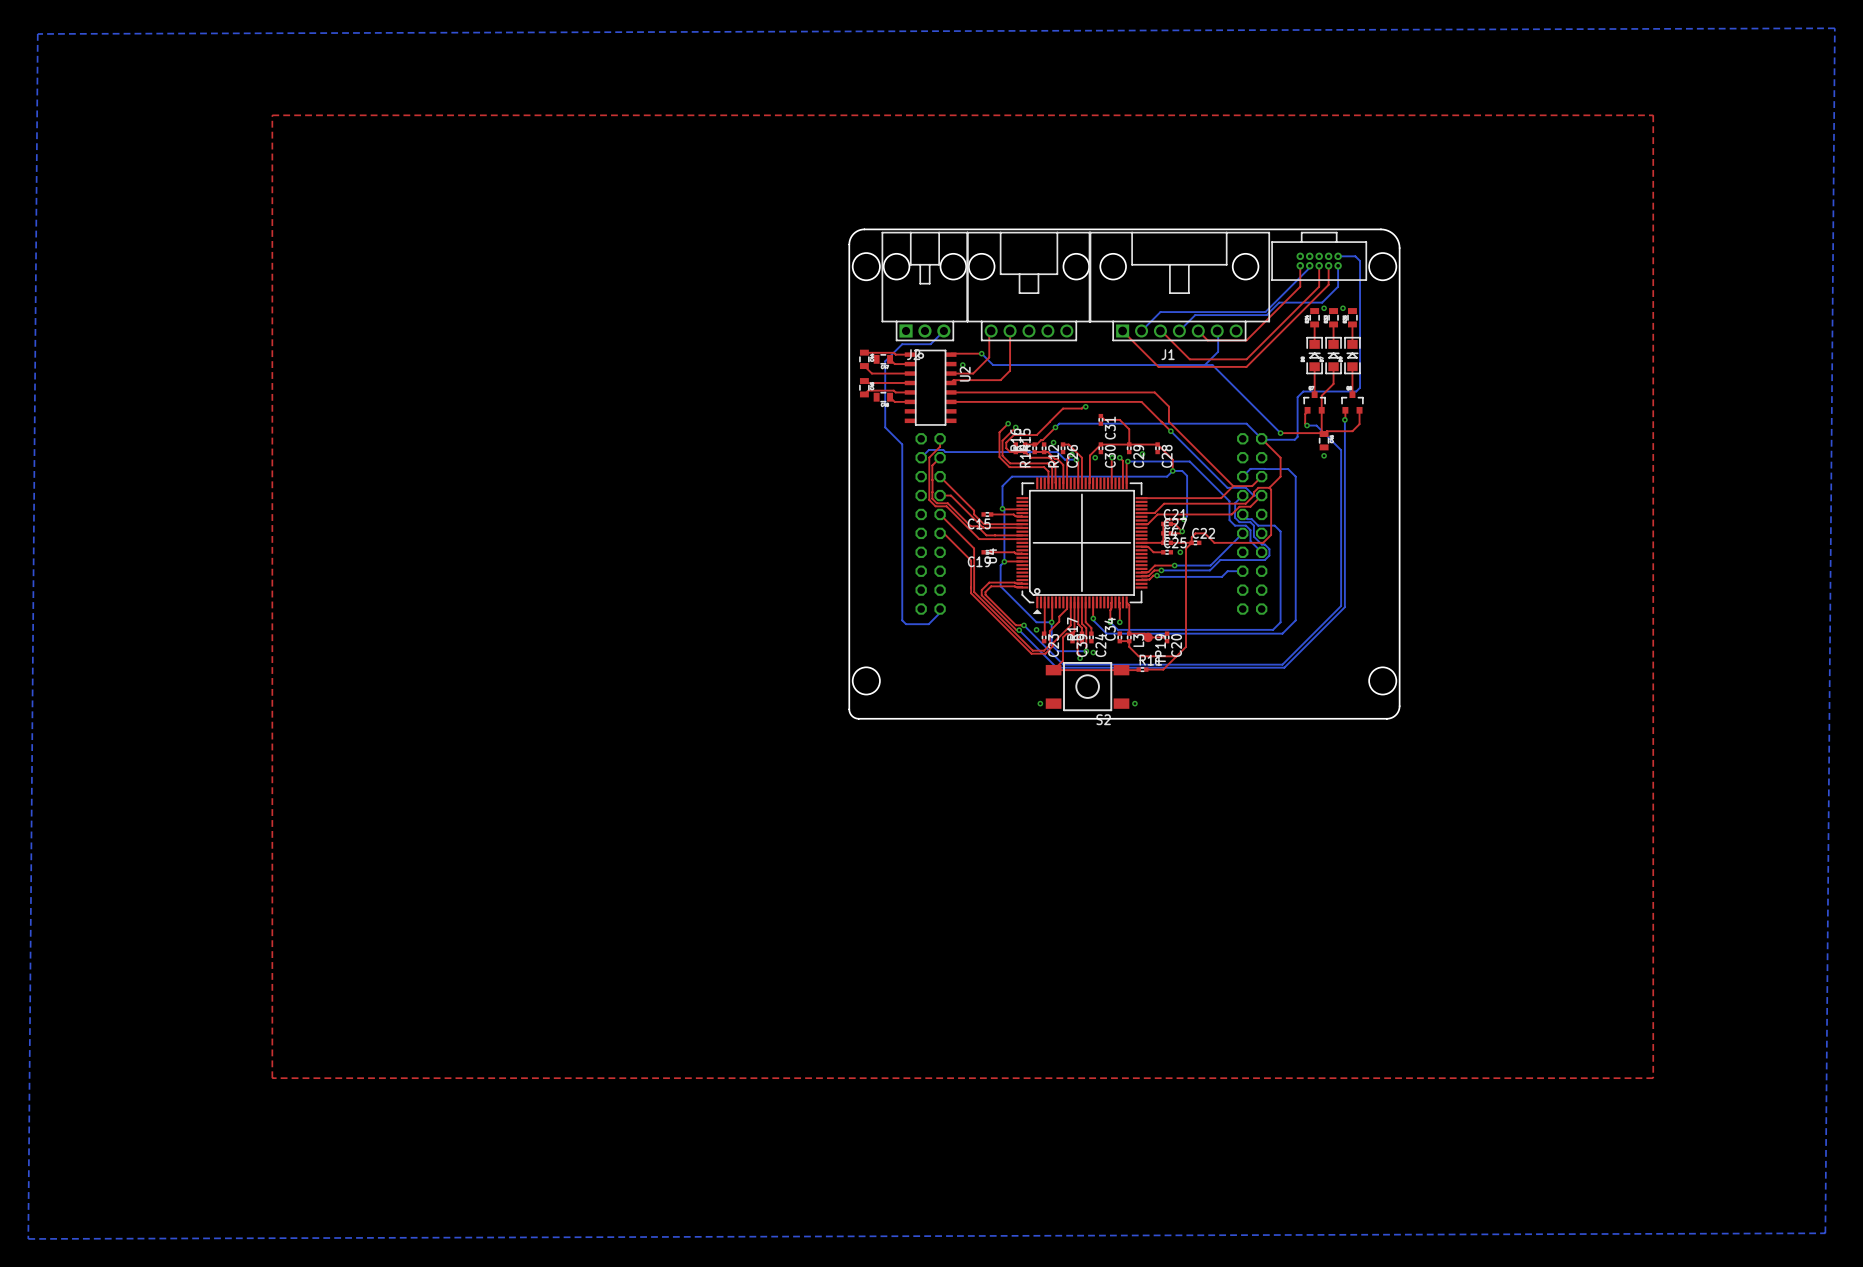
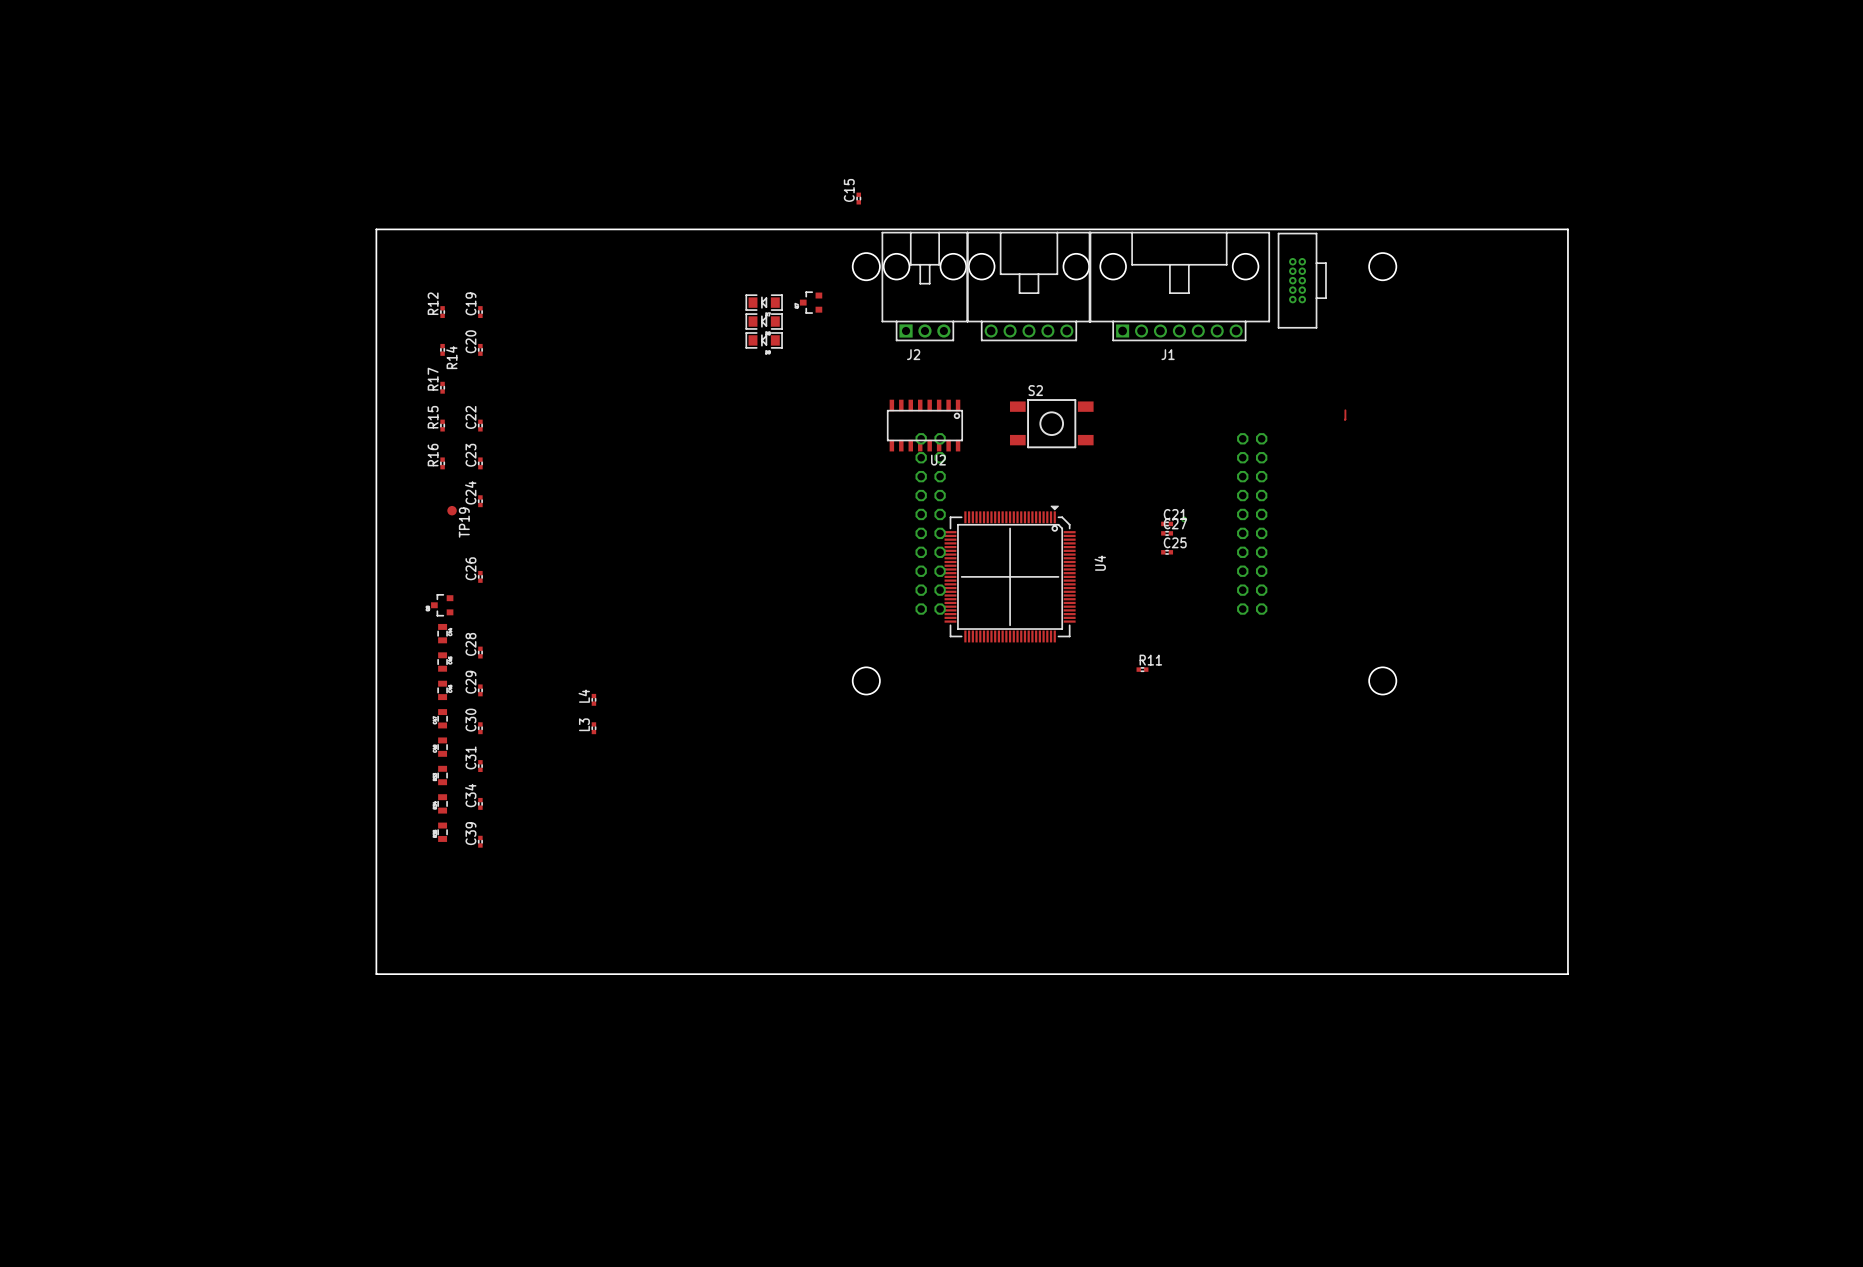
bottom zone outline: (1834, 28) (1825, 1233) (28, 1238) (37, 33) (1834, 28) -> none
top zone outline: (272, 115) (1653, 115) (1653, 1078) (272, 1078) (272, 115) -> none
board edge: (864, 229) (853, 233) (849, 244) (849, 709) (852, 715) (858, 718) (1386, 718) (1395, 715) (1399, 706) (1399, 248) (1394, 234) (1380, 229) -> (864, 229) (376, 229) (376, 974) (1567, 974) (1567, 229) (1380, 229)
part rotation: 0° (1319, 256) -> 90° clockwise (1302, 280)
bottom track: (1338, 256) (1355, 256) (1360, 260) (1360, 387) (1356, 391) (1303, 391) (1297, 397) (1297, 436) (1294, 439) (1262, 439) -> none
top track: (1300, 265) (1300, 286) (1246, 340) (1207, 340) (1198, 330) -> none
bottom track: (1309, 265) (1265, 312) (1160, 312) (1141, 330) -> none
top track: (1319, 265) (1319, 286) (1246, 359) (1189, 359) (1160, 330) -> none
top track: (1328, 265) (1328, 284) (1246, 366) (1158, 366) (1122, 330) -> none
bottom track: (1338, 265) (1338, 286) (1322, 302) (1279, 302) (1266, 315) (1195, 315) (1179, 330) -> none
via: (1324, 308) -> none
via: (1343, 308) -> none
part position: (1314, 317) -> (442, 803)
part position: (1333, 317) -> (442, 775)
part position: (1352, 317) -> (442, 832)
top track: (1314, 324) (1314, 344) -> none
top track: (1333, 324) (1333, 344) -> none
top track: (1352, 324) (1352, 344) -> none
bottom track: (943, 330) (930, 344) (902, 344) (885, 361) (885, 427) (902, 444) (902, 620) (906, 624) (928, 624) (940, 612) (940, 609) -> none
top track: (991, 330) (989, 332) (989, 357) (973, 373) (950, 373) -> none
top track: (1010, 330) (1010, 370) (1000, 380) (953, 380) (950, 383) -> none
bottom track: (1217, 330) (1218, 351) (1204, 365) -> none
top track: (864, 352) (910, 354) -> none
top track: (981, 353) (950, 354) -> none
bottom track: (981, 353) (993, 365) (1212, 365) (1280, 433) -> none
via: (981, 353) -> none
part rotation: 0° (1314, 355) -> 90° counterclockwise (764, 321)
part position: (1314, 355) -> (764, 321)
part rotation: 0° (1333, 355) -> 90° counterclockwise (764, 302)
part position: (1333, 355) -> (764, 302)
part rotation: 0° (1352, 355) -> 90° counterclockwise (764, 340)
part position: (1352, 355) -> (764, 340)
part position: (864, 359) -> (442, 633)
part rotation: 0° (883, 359) -> 90° clockwise (442, 718)
part position: (883, 359) -> (442, 718)
top track: (890, 359) (894, 364) (910, 364) -> none
via: (962, 365) -> none
top track: (864, 366) (871, 373) (910, 373) -> none
top track: (1314, 366) (1314, 394) -> none
top track: (1333, 366) (1333, 383) (1321, 395) (1321, 431) (1324, 433) (1326, 431) (1352, 431) (1359, 424) (1359, 410) -> none
top track: (1352, 366) (1352, 394) -> none
top track: (864, 381) (866, 383) (910, 383) -> none
part position: (864, 387) -> (442, 662)
U2 rotation: 0° (930, 387) -> 90° clockwise (924, 425)
top track: (910, 392) (868, 390) (864, 394) -> none
top track: (950, 392) (1154, 392) (1168, 406) (1168, 421) (1233, 486) -> none
part rotation: 0° (883, 397) -> 90° clockwise (442, 747)
part position: (883, 397) -> (442, 747)
top track: (890, 397) (894, 401) (910, 401) -> none
top track: (950, 401) (1141, 401) (1170, 431) -> none
part rotation: 0° (1314, 402) -> 90° counterclockwise (811, 302)
part position: (1314, 402) -> (811, 302)
part rotation: 0° (1352, 402) -> 90° counterclockwise (442, 605)
part position: (1352, 402) -> (442, 605)
top track: (1085, 406) (1063, 408) (1036, 435) (1013, 435) (1006, 442) (1006, 448) (1010, 451) (1025, 451) -> none
via: (1085, 406) -> none
top track: (1307, 410) (1305, 414) (1305, 423) (1307, 425) -> none
top track: (1100, 416) (1104, 419) (1119, 419) (1129, 429) (1129, 444) -> none
C31 position: (1100, 419) -> (480, 766)
bottom track: (1344, 419) (1344, 607) (1284, 667) (1056, 667) (1019, 630) -> none
via: (1344, 419) -> none
top track: (1008, 423) (999, 432) (999, 457) (1009, 467) (1044, 467) (1048, 471) (1048, 483) -> none
via: (1008, 423) -> none
bottom track: (1307, 425) (1316, 425) (1341, 450) (1341, 606) (1282, 664) (1063, 664) (1024, 625) -> none
via: (1307, 425) -> none
top track: (1015, 427) (1002, 440) (1002, 455) (1010, 463) (1047, 463) (1052, 467) (1052, 483) -> none
via: (1015, 427) -> none
top track: (1055, 427) (1036, 444) (1025, 444) -> none
bottom track: (1055, 427) (1059, 423) (1246, 423) (1265, 442) -> none
via: (1055, 427) -> none
C31 name position: C31 (1110, 428) -> C31 (470, 757)
bottom track: (1170, 431) (1227, 487) (1245, 487) (1253, 495) (1261, 495) -> none
via: (1170, 431) -> none
top track: (1280, 433) (1323, 433) -> none
via: (1280, 433) -> none
top track: (940, 438) (940, 446) (929, 457) (929, 500) (935, 506) (946, 506) (979, 539) (1022, 539) -> none
top track: (1261, 438) (1280, 457) (1280, 476) (1269, 487) (1258, 487) (1245, 503) (1164, 503) (1154, 513) (1141, 513) -> none
part position: (1324, 440) -> (442, 690)
via: (1053, 442) -> none
top track: (1063, 444) (1068, 444) (1081, 457) (1081, 483) -> none
R14 position: (1015, 448) -> (442, 349)
R16 position: (1025, 448) -> (442, 463)
R15 position: (1034, 448) -> (442, 425)
R12 position: (1044, 448) -> (442, 312)
C26 position: (1063, 448) -> (480, 576)
C30 position: (1100, 448) -> (480, 728)
C29 position: (1129, 448) -> (480, 690)
C28 position: (1157, 448) -> (480, 652)
top track: (1034, 451) (1047, 451) (1063, 464) (1063, 482) -> none
top track: (1025, 452) (1030, 457) (1049, 457) (1055, 463) (1055, 483) -> none
via: (1142, 453) -> none
top track: (1071, 454) (1067, 459) (1067, 483) -> none
via: (1071, 454) -> none
via: (1324, 455) -> none
R12 name position: R12 (1053, 456) -> R12 (433, 303)
C26 name position: C26 (1072, 456) -> C26 (470, 568)
C30 name position: C30 (1110, 456) -> C30 (470, 720)
C29 name position: C29 (1138, 456) -> C29 (470, 682)
C28 name position: C28 (1167, 456) -> C28 (470, 644)
bottom track: (921, 457) (928, 449) (943, 449) (945, 452) (1057, 452) (1064, 459) (1076, 459) -> none
top track: (940, 457) (932, 465) (932, 498) (936, 503) (947, 503) (970, 526) (977, 526) (986, 535) (1022, 535) -> none
via: (1095, 457) -> none
top track: (1112, 457) (1111, 483) -> none
via: (1112, 457) -> none
top track: (1119, 457) (1122, 460) (1122, 483) -> none
via: (1119, 457) -> none
top track: (1076, 459) (1078, 461) (1078, 483) -> none
via: (1076, 459) -> none
top track: (1127, 461) (1126, 483) -> none
bottom track: (1127, 461) (1189, 461) (1229, 501) (1229, 520) (1234, 525) (1245, 525) (1250, 530) (1250, 541) (1261, 552) -> none
via: (1127, 461) -> none
top track: (1172, 470) (1172, 459) (1157, 444) (1100, 444) (1089, 455) (1089, 483) -> none
via: (1172, 470) -> none
top track: (940, 476) (974, 510) (974, 514) (983, 524) (1022, 524) -> none
bottom track: (1242, 476) (1250, 468) (1288, 469) (1295, 476) (1295, 620) (1282, 633) (1106, 633) (1093, 618) -> none
top track: (1261, 476) (1252, 486) (1233, 486) -> none
top track: (1233, 486) (1221, 498) (1141, 498) -> none
top track: (1269, 487) (1271, 489) (1271, 534) (1263, 542) (1214, 542) (1204, 533) (1195, 533) (1191, 537) (1191, 542) (1186, 548) (1186, 646) (1163, 669) (1146, 669) -> none
top track: (940, 495) (950, 495) (983, 527) (1022, 527) -> none
bottom track: (1242, 495) (1235, 503) (1234, 517) (1239, 522) (1250, 522) (1253, 525) (1253, 536) (1269, 549) (1269, 555) (1264, 560) (1220, 560) (1209, 570) (1161, 570) -> none
top track: (1261, 495) (1250, 506) (1239, 506) (1231, 514) (1157, 514) (1147, 524) (1141, 524) -> none
top track: (1002, 508) (1022, 509) -> none
via: (1002, 508) -> none
top track: (940, 514) (974, 548) (974, 592) (1032, 650) (1044, 650) (1049, 644) (1049, 631) (1059, 621) (1059, 616) (1067, 608) (1067, 602) -> none
C15 rotation: 0° (987, 514) -> 90° clockwise (858, 198)
C15 position: (987, 514) -> (858, 198)
top track: (991, 514) (1013, 514) (1022, 516) -> none
bottom track: (1242, 514) (1258, 525) (1274, 525) (1280, 531) (1280, 622) (1273, 629) (1117, 629) (1110, 622) -> none
top track: (1184, 519) (1167, 519) (1163, 523) (1163, 542) (1141, 542) -> none
bottom track: (1184, 519) (1187, 516) (1187, 475) (1182, 470) (1172, 470) (1167, 476) (1011, 476) (1002, 486) (1004, 561) (1000, 565) (1000, 586) (1036, 622) (1051, 622) (1051, 644) (1057, 651) (1086, 651) -> none
top track: (1170, 523) (1174, 523) (1182, 531) (1180, 533) (1170, 533) -> none
via: (1182, 531) -> none
top track: (940, 533) (943, 533) (971, 560) (971, 593) (1031, 653) (1045, 653) (1070, 625) (1070, 602) -> none
C22 name position: C22 (1203, 533) -> C22 (470, 417)
bottom track: (1242, 533) (1210, 565) (1174, 565) -> none
L4 rotation: 0° (1167, 542) -> 90° clockwise (593, 699)
L4 position: (1167, 542) -> (593, 699)
top track: (1170, 542) (1191, 542) -> none
C22 rotation: 0° (1195, 542) -> 90° clockwise (480, 425)
C22 position: (1195, 542) -> (480, 425)
U4 rotation: 0° (1081, 545) -> 180° (1010, 574)
top track: (1141, 546) (1148, 547) (1153, 552) (1163, 552) -> none
C19 rotation: 0° (987, 552) -> 90° clockwise (480, 312)
C19 position: (987, 552) -> (480, 312)
top track: (991, 552) (1022, 554) -> none
via: (1180, 552) -> none
via: (1004, 561) -> none
top track: (1022, 561) (1004, 561) -> none
top track: (1174, 565) (1154, 565) (1148, 572) (1141, 572) -> none
via: (1174, 565) -> none
top track: (1161, 570) (1154, 570) (1148, 575) (1141, 576) -> none
via: (1161, 570) -> none
bottom track: (1242, 571) (1227, 571) (1221, 576) (1157, 575) -> none
top track: (1157, 575) (1153, 575) (1149, 579) (1141, 580) -> none
via: (1157, 575) -> none
top track: (1022, 583) (989, 582) (981, 590) (981, 595) (1016, 630) (1019, 630) -> none
top track: (1022, 587) (991, 586) (985, 592) (985, 594) (1015, 625) (1024, 625) -> none
top track: (1044, 602) (1044, 633) -> none
top track: (1052, 602) (1051, 622) -> none
top track: (1074, 602) (1074, 631) (1066, 633) (1063, 637) (1063, 660) (1053, 670) (1138, 669) -> none
top track: (1078, 602) (1078, 624) (1081, 627) (1081, 633) (1077, 638) (1077, 653) (1080, 658) -> none
top track: (1081, 602) (1081, 623) (1086, 628) (1086, 651) -> none
top track: (1085, 602) (1085, 622) (1091, 627) (1091, 633) -> none
top track: (1093, 602) (1093, 618) -> none
top track: (1111, 602) (1110, 622) -> none
top track: (1119, 602) (1119, 609) -> none
top track: (1126, 602) (1129, 605) (1129, 633) (1144, 633) (1148, 637) (1163, 637) (1167, 633) -> none
top track: (1119, 609) (1119, 622) -> none
via: (1093, 618) -> none
via: (1051, 622) -> none
via: (1110, 622) -> none
via: (1119, 622) -> none
via: (1024, 625) -> none
via: (1036, 629) -> none
via: (1019, 630) -> none
C23 position: (1044, 637) -> (480, 463)
C39 position: (1072, 637) -> (480, 841)
R17 position: (1081, 637) -> (442, 387)
C24 position: (1091, 637) -> (480, 501)
C34 position: (1119, 637) -> (480, 803)
L3 position: (1129, 637) -> (593, 728)
TP19 position: (1148, 637) -> (452, 510)
C20 position: (1167, 637) -> (480, 349)
L3 name position: L3 (1138, 640) -> L3 (584, 724)
top track: (1119, 641) (1129, 641) (1129, 646) (1138, 656) (1176, 656) -> none
C23 name position: C23 (1053, 645) -> C23 (470, 455)
C39 name position: C39 (1081, 645) -> C39 (470, 833)
C24 name position: C24 (1100, 645) -> C24 (470, 492)
C20 name position: C20 (1176, 645) -> C20 (470, 341)
via: (1086, 651) -> none
via: (1093, 652) -> none
via: (1080, 658) -> none
S2 rotation: 0° (1087, 686) -> 180° (1051, 423)
S2 position: (1087, 686) -> (1051, 423)
via: (1040, 703) -> none
via: (1134, 703) -> none

